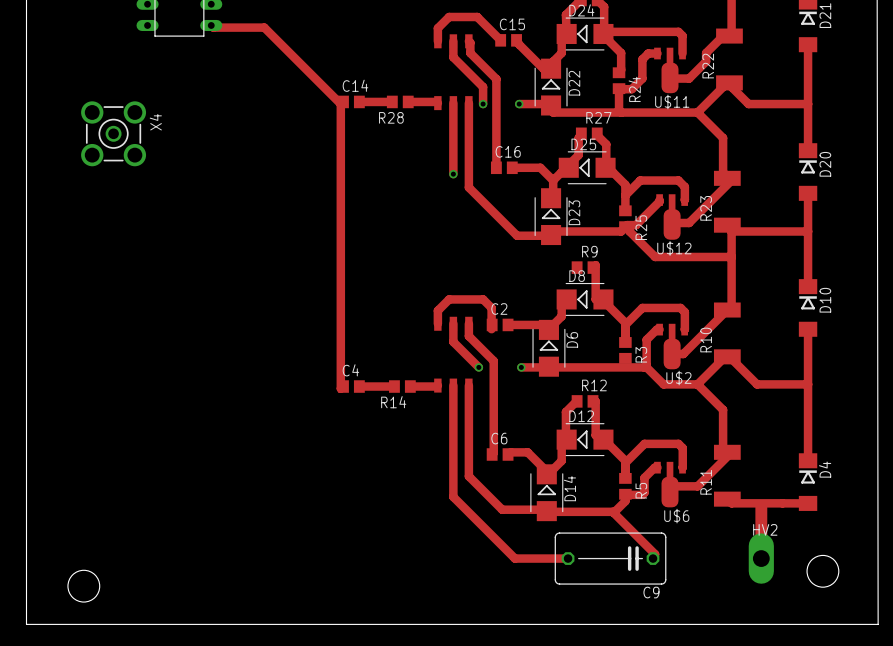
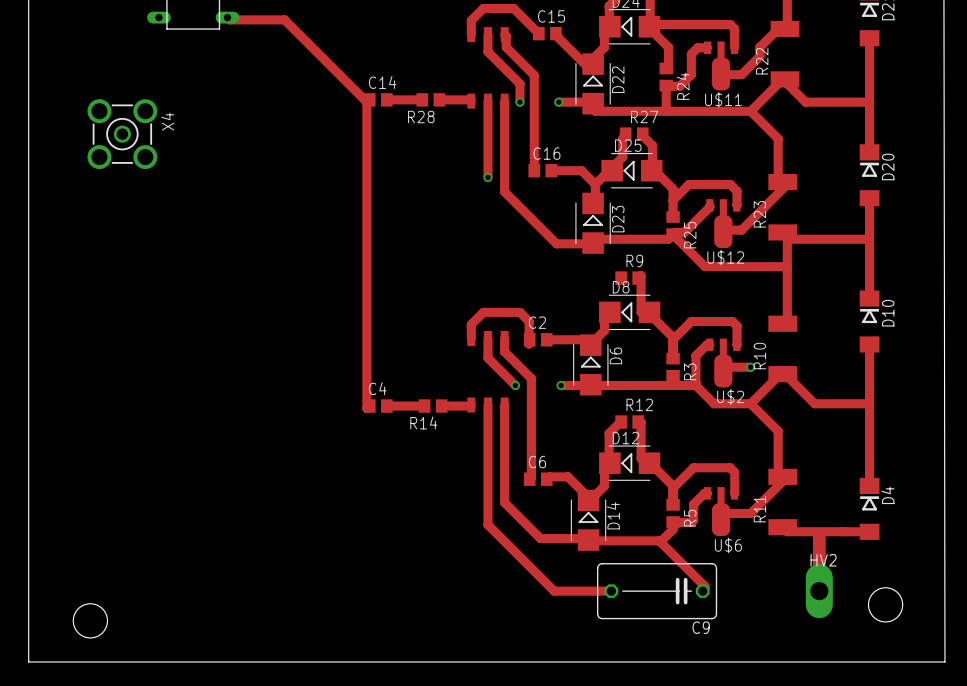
track: (727, 310) (683, 354) (672, 354) -> (750, 367) (723, 367) (723, 371)
via: none -> (750, 367)

